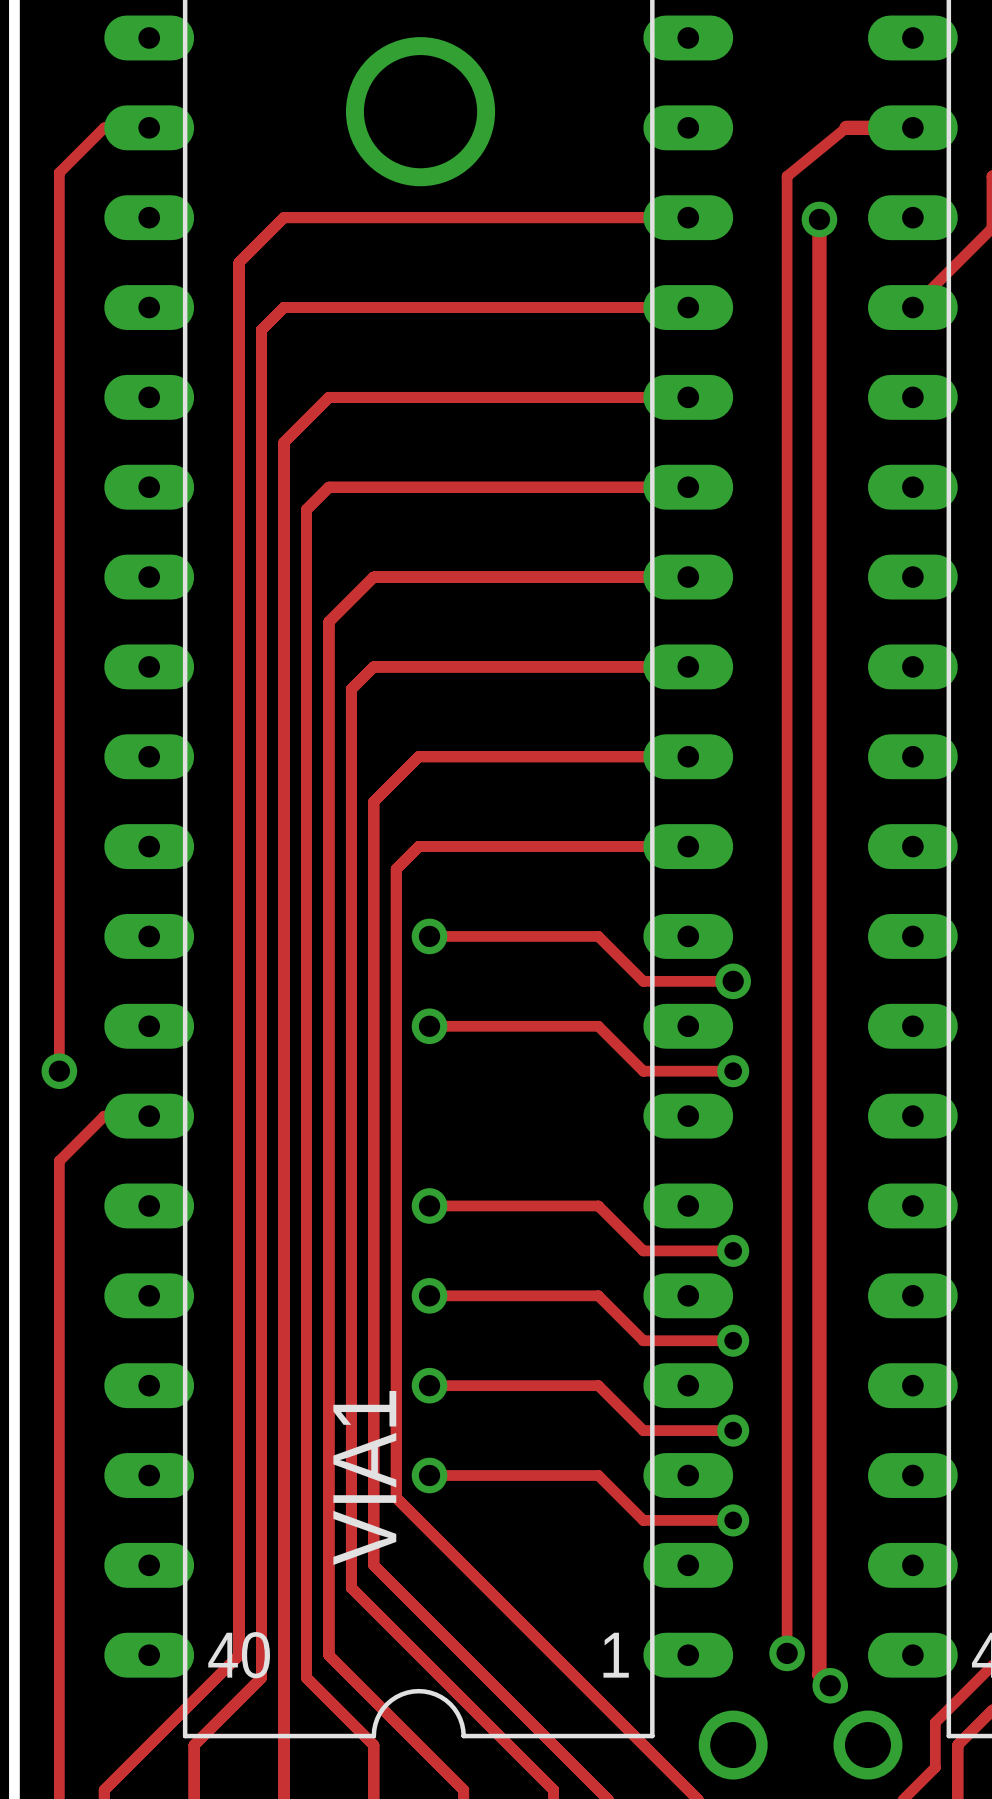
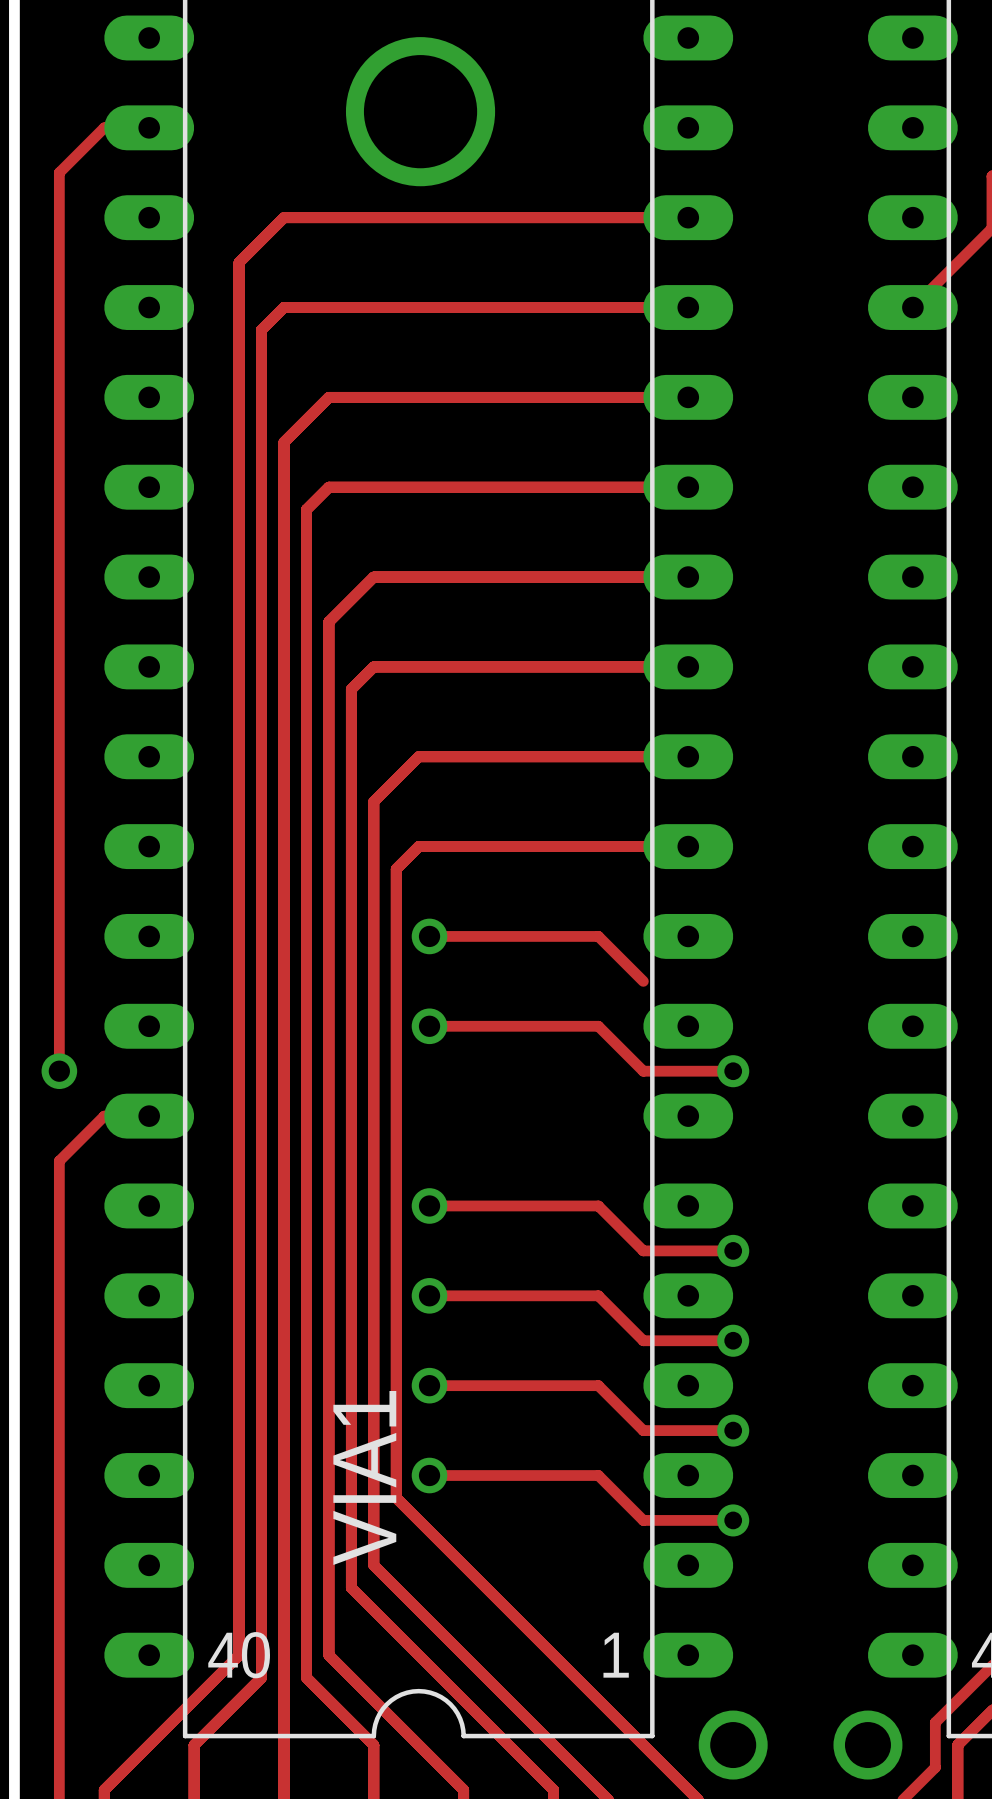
track: (912, 127) (846, 127) (787, 176) (787, 1653) -> none
track: (819, 219) (819, 1674) (830, 1685) -> none
via: (819, 219) -> none
track: (643, 981) (733, 981) -> none
via: (733, 981) -> none
via: (787, 1653) -> none
via: (830, 1685) -> none

